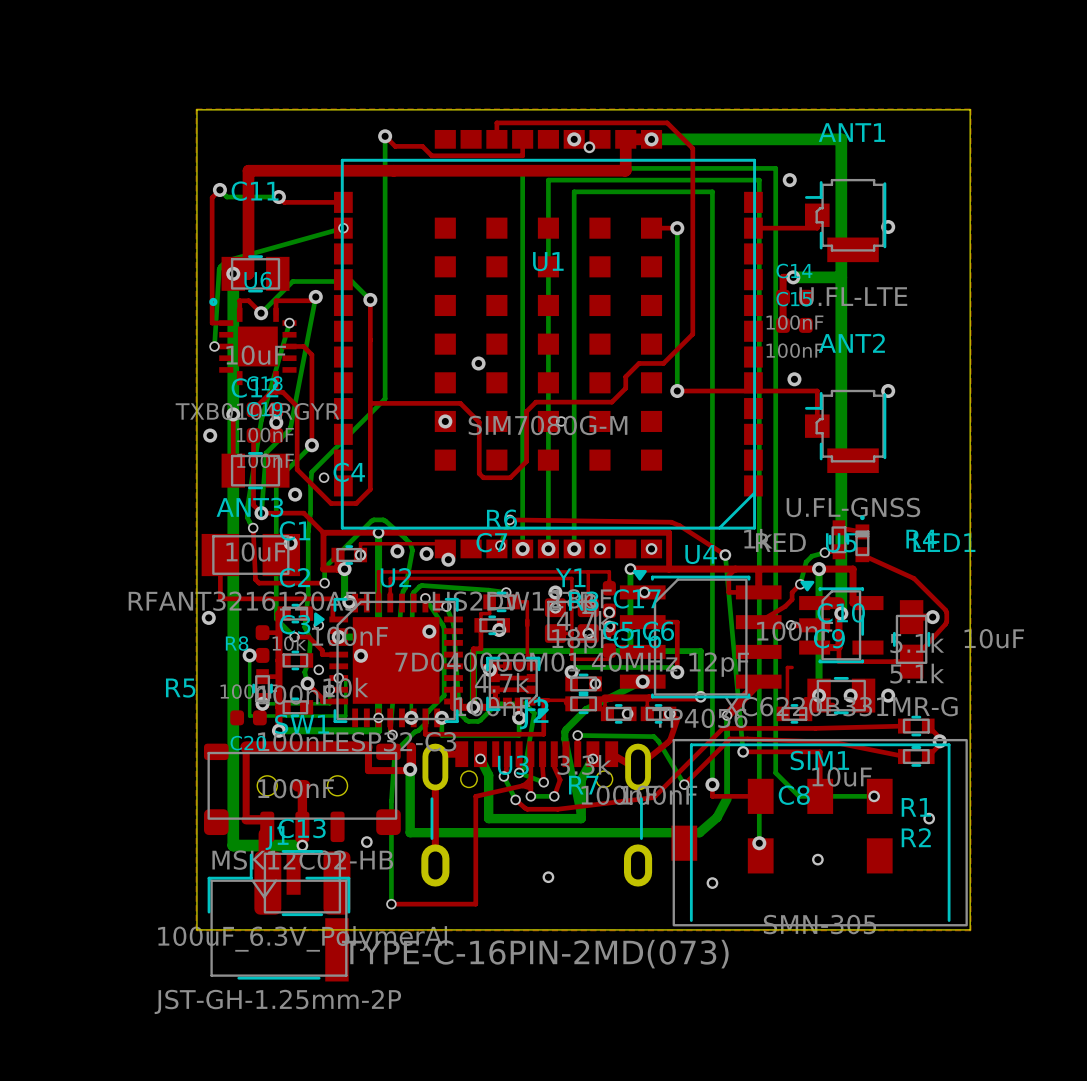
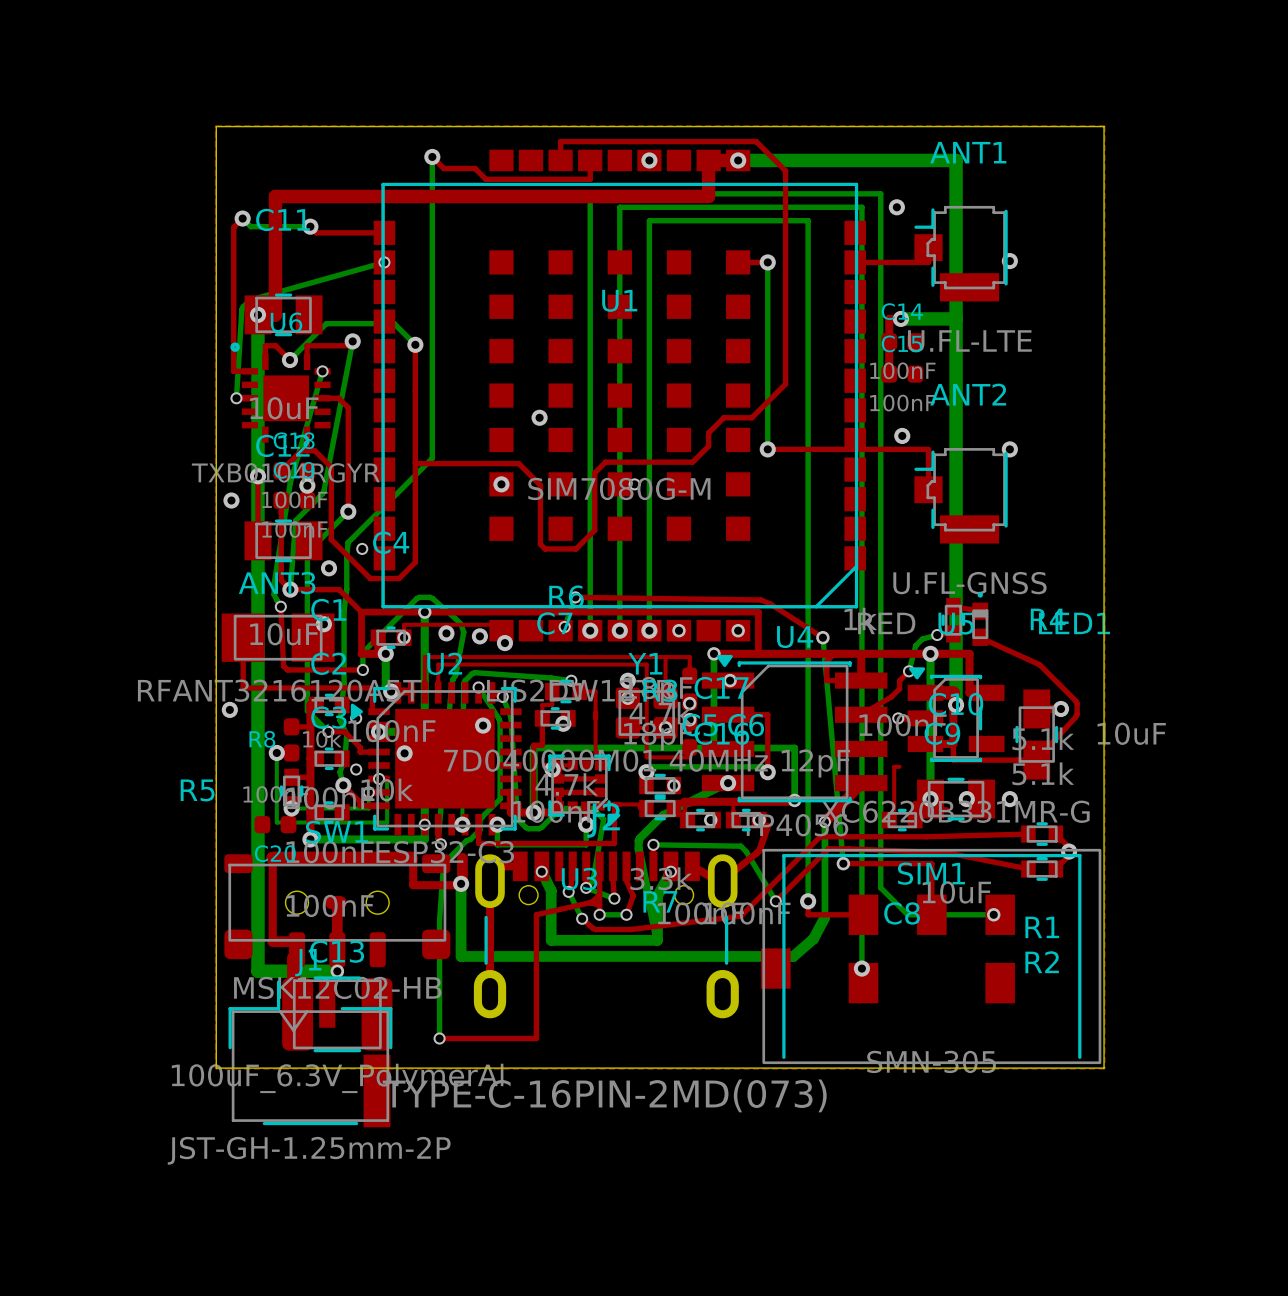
via: (589, 147) -> none
via: (929, 818) -> none
via: (366, 842) -> none
via: (817, 859) -> none
via: (548, 877) -> none
via: (712, 883) -> none

